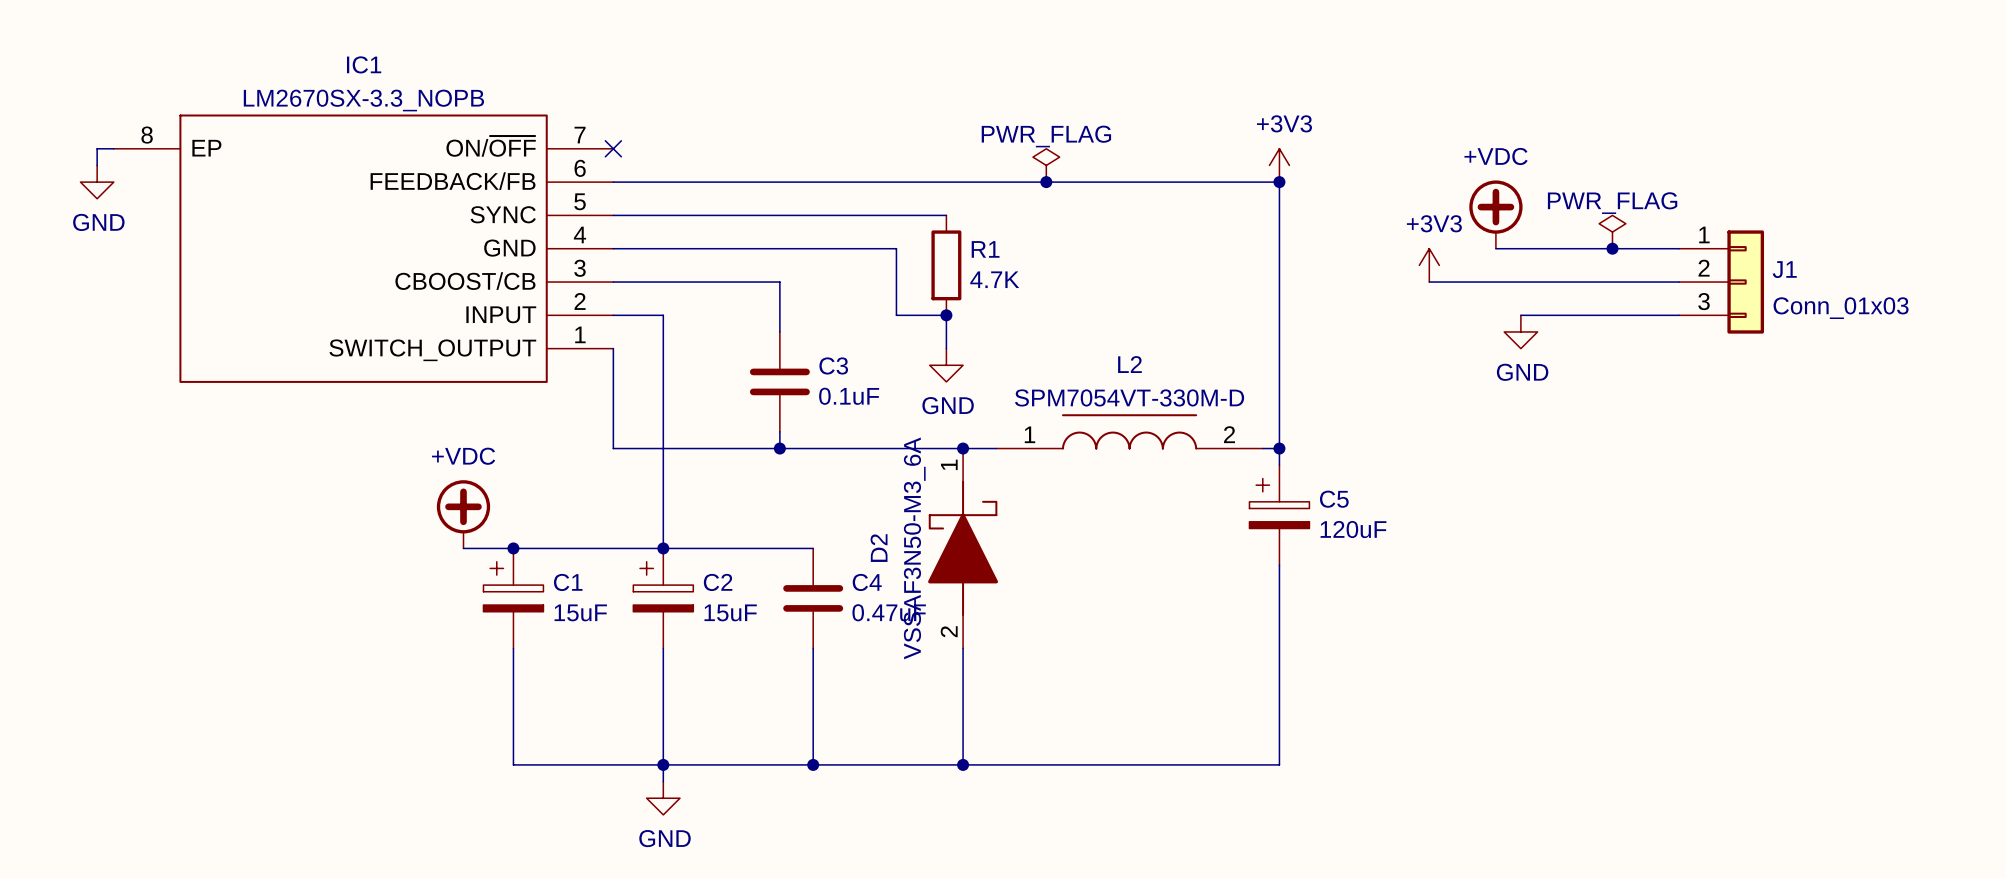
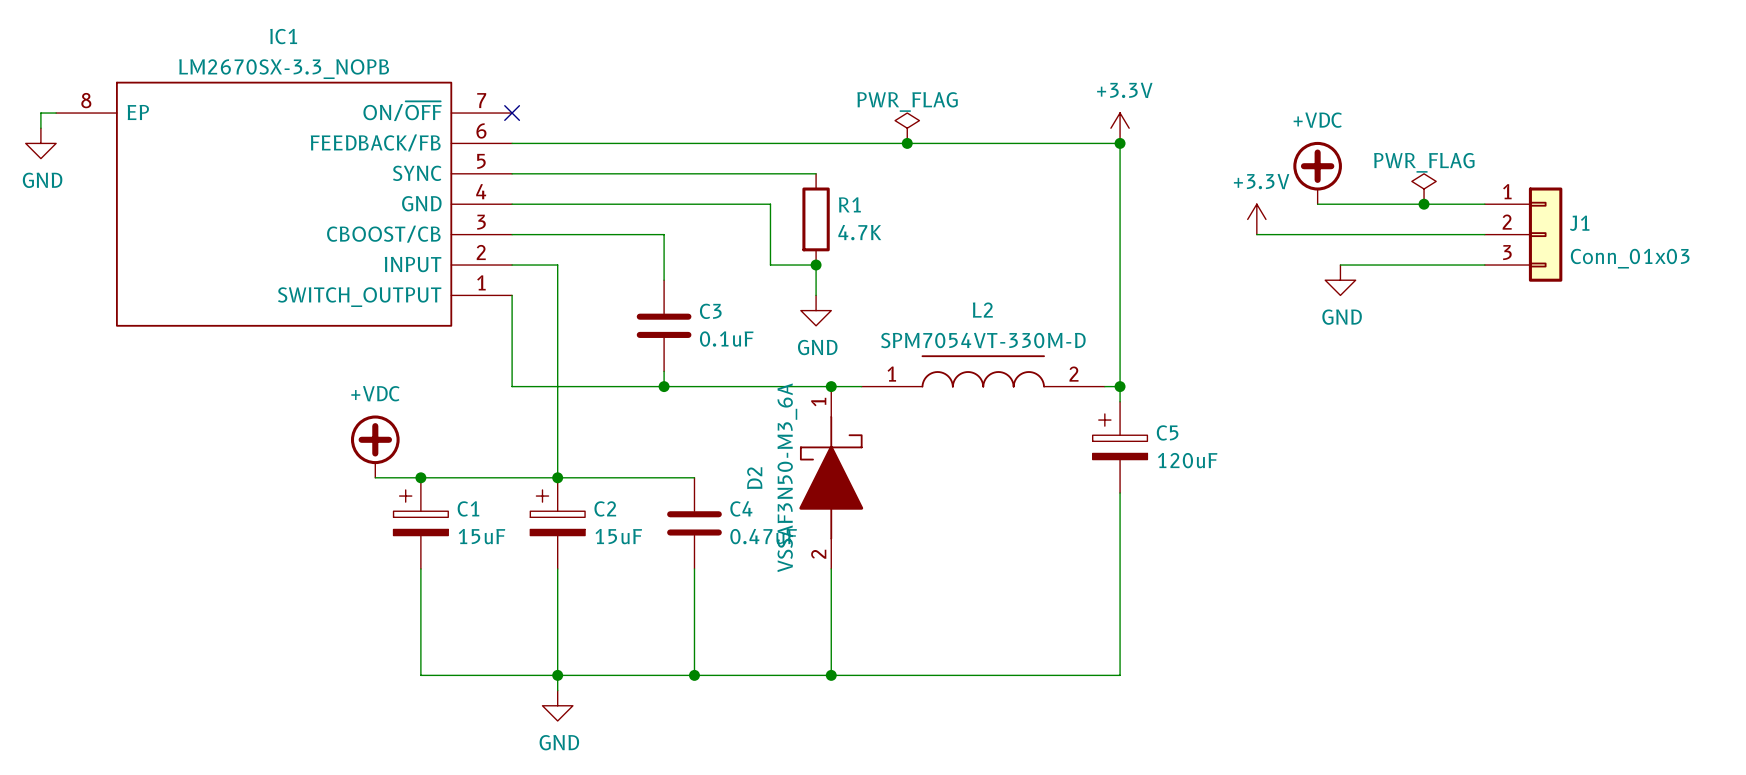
power symbol: +3V3 (1279, 165) -> +3.3V (1120, 128)
power symbol: +3V3 (1429, 265) -> +3.3V (1256, 219)

